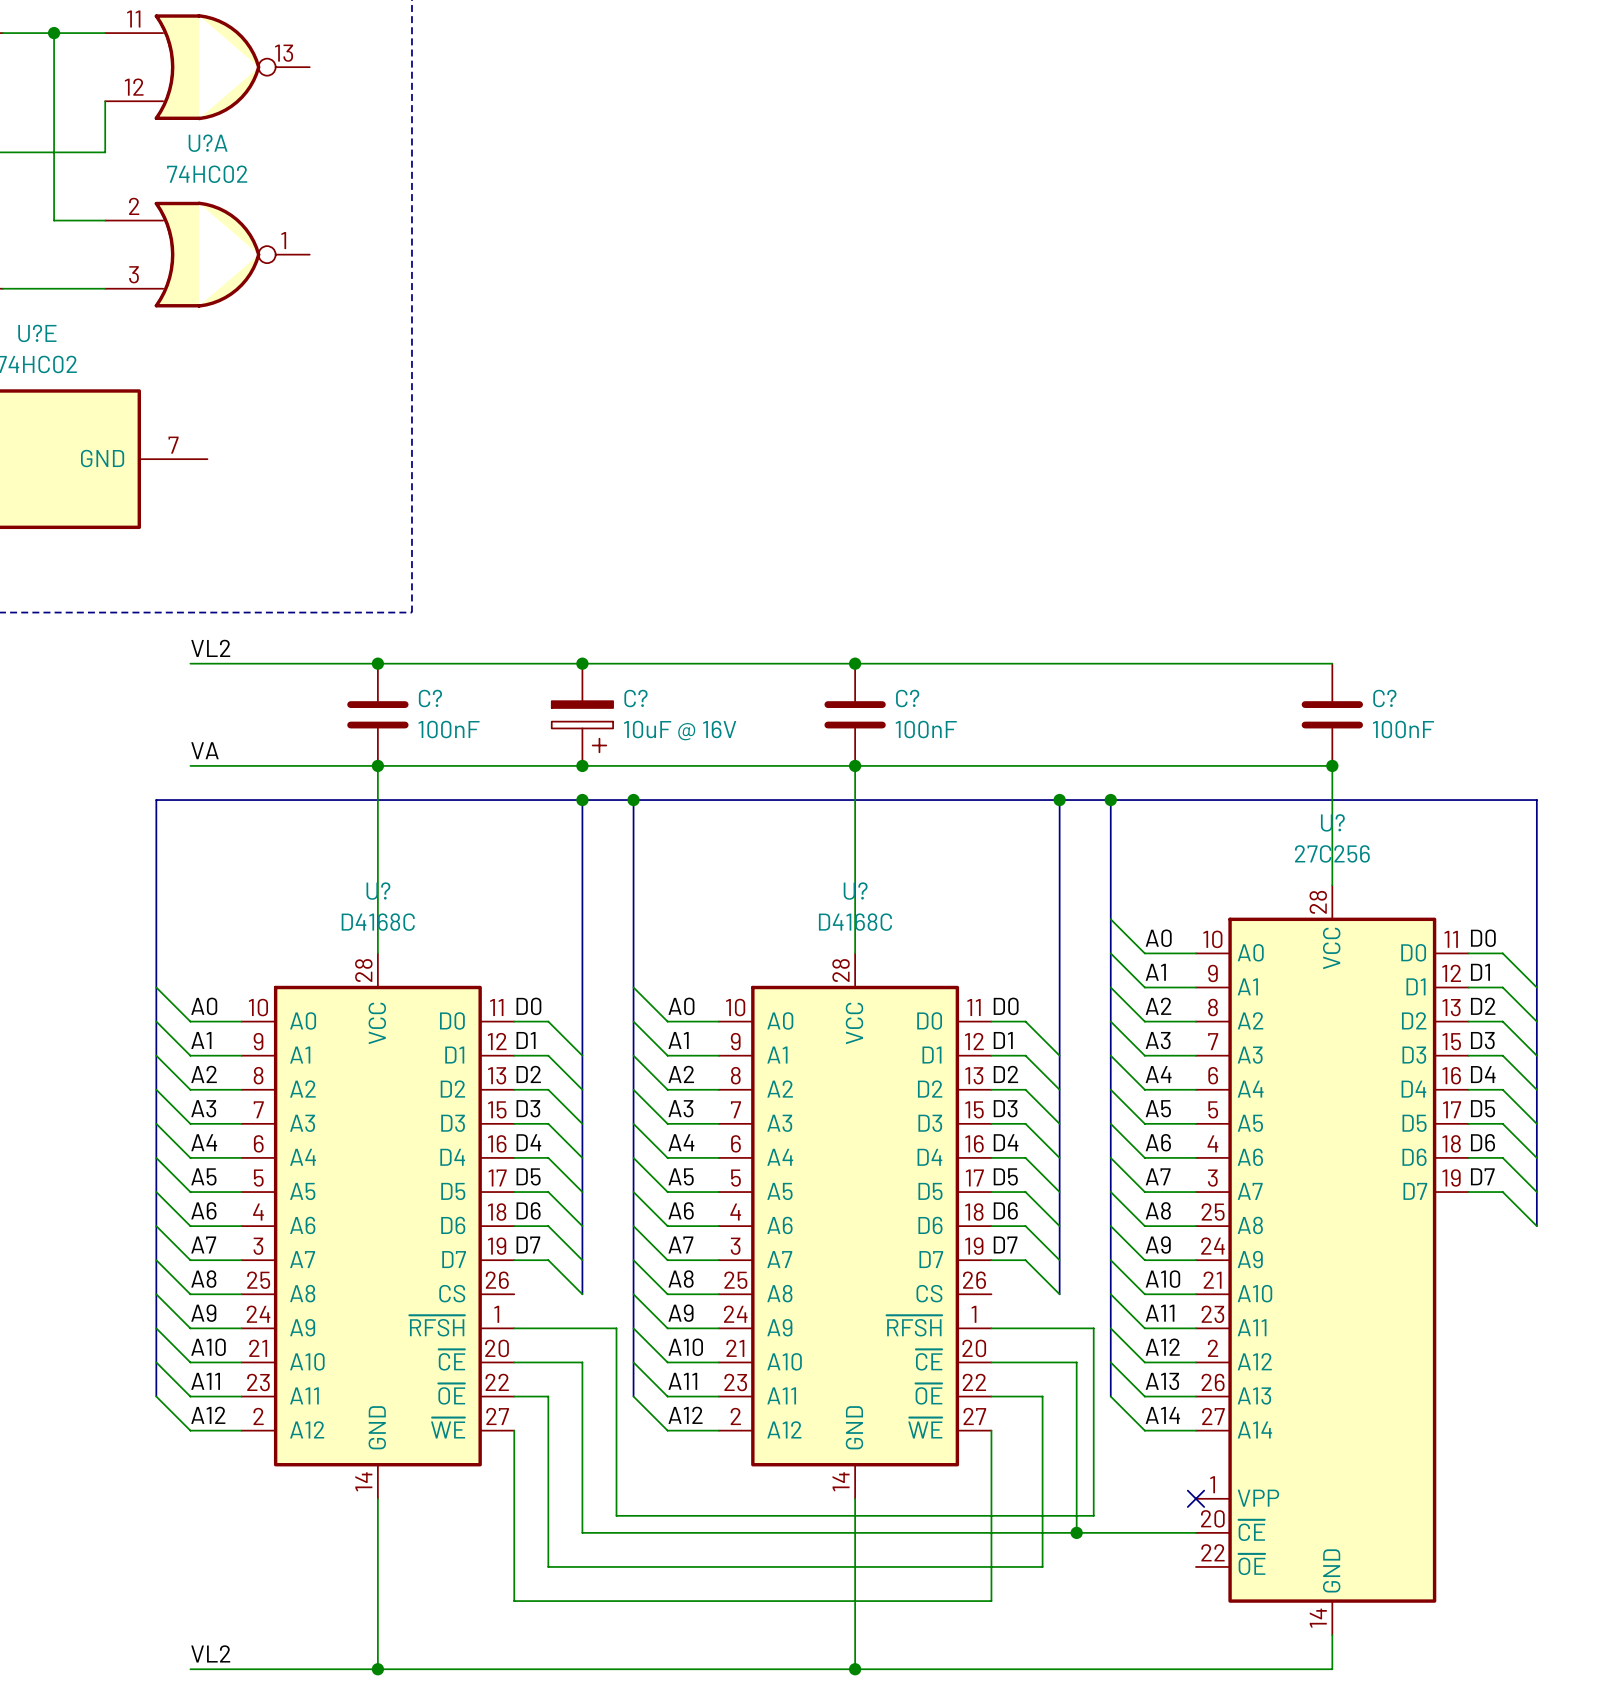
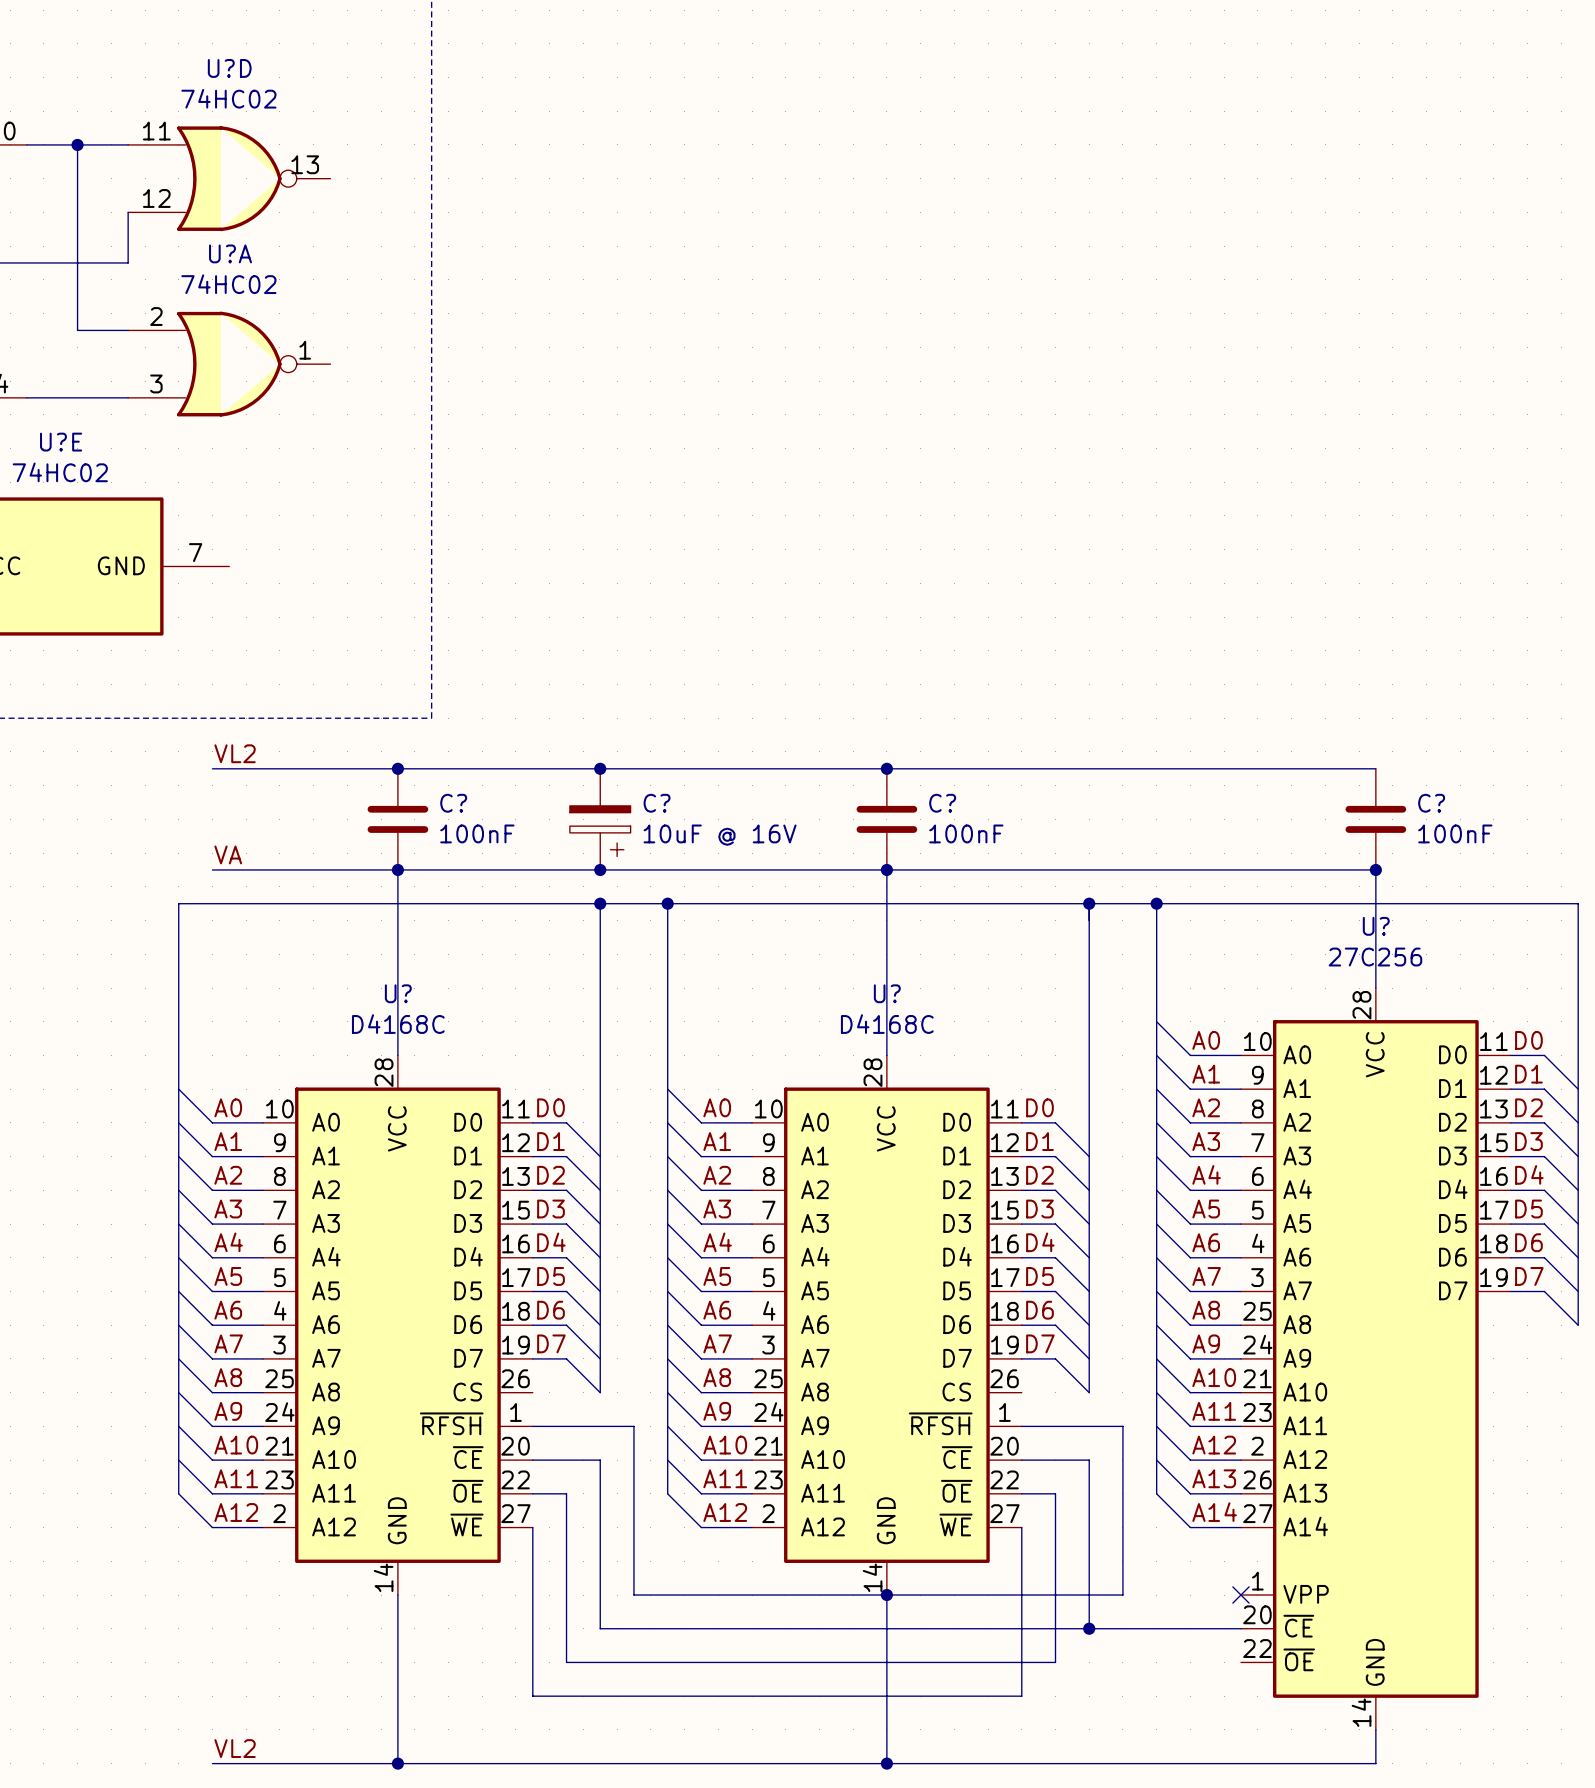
junction position: (855, 663) -> (886, 768)
wire: none -> (1342, 768) (1375, 768)
C? position: (855, 714) -> (886, 819)
C? position: (1332, 714) -> (1375, 819)
wire: (855, 765) (855, 953) -> (886, 869) (886, 1055)
junction position: (855, 765) -> (886, 869)
wire: (1332, 765) (1332, 885) -> (1342, 869) (1375, 869) (1375, 988)
junction position: (1332, 765) -> (1375, 869)
bus: (633, 800) (633, 1396) -> (667, 903) (667, 1493)
junction position: (633, 800) -> (667, 903)
bus: (1059, 800) (1059, 1294) -> (1089, 903) (1089, 1392)
junction: (1059, 800) -> none
junction: none -> (1089, 903)
bus: (1110, 800) (1110, 1396) -> (1156, 903) (1156, 1493)
junction: (1110, 800) -> none
junction: none -> (1156, 903)
bus: (1536, 800) (1536, 1226) -> (1544, 903) (1578, 903) (1578, 1325)
wire: (1110, 919) (1144, 953) (1178, 953) -> (1156, 1021) (1190, 1055)
label position: A0 (1158, 938) -> A0 (1206, 1040)
label position: D0 (1483, 938) -> D0 (1528, 1040)
wire: (1110, 953) (1144, 987) (1178, 987) -> (1156, 1055) (1190, 1089)
wire: (1468, 953) (1502, 953) (1536, 987) -> (1510, 1055) (1544, 1055) (1578, 1089)
label position: A1 (1155, 972) -> A1 (1206, 1074)
label position: D1 (1480, 972) -> D1 (1528, 1074)
wire: (633, 987) (667, 1021) (684, 1021) -> (667, 1089) (701, 1122)
wire: (1110, 987) (1144, 1021) (1178, 1021) -> (1156, 1089) (1190, 1122)
wire: (1468, 987) (1502, 987) (1536, 1021) -> (1510, 1089) (1544, 1089) (1578, 1122)
label position: A0 (681, 1006) -> A0 (717, 1107)
label position: D0 (1006, 1006) -> D0 (1039, 1107)
label position: A2 (1158, 1006) -> A2 (1206, 1107)
label position: D2 (1483, 1006) -> D2 (1528, 1107)
wire: (633, 1021) (667, 1055) (684, 1055) -> (667, 1122) (701, 1156)
wire: (1025, 1021) (1059, 1055) -> (1038, 1122) (1055, 1122) (1089, 1156)
wire: (1110, 1021) (1144, 1055) (1178, 1055) -> (1156, 1122) (1190, 1156)
wire: (1468, 1021) (1502, 1021) (1536, 1055) -> (1510, 1122) (1544, 1122) (1578, 1156)
label position: A1 (678, 1040) -> A1 (717, 1141)
label position: D1 (1003, 1040) -> D1 (1039, 1141)
label position: A3 (1158, 1040) -> A3 (1206, 1141)
label position: D3 (1482, 1040) -> D3 (1528, 1141)
wire: (633, 1055) (667, 1089) (684, 1089) -> (667, 1156) (701, 1190)
wire: (1025, 1055) (1059, 1089) -> (1038, 1156) (1055, 1156) (1089, 1190)
wire: (1110, 1055) (1144, 1089) (1178, 1089) -> (1156, 1156) (1190, 1190)
wire: (1468, 1055) (1502, 1055) (1536, 1089) -> (1510, 1156) (1544, 1156) (1578, 1190)
label position: A2 (681, 1074) -> A2 (717, 1175)
label position: D2 (1005, 1074) -> D2 (1039, 1175)
label position: A4 (1158, 1074) -> A4 (1206, 1174)
label position: D4 (1483, 1074) -> D4 (1529, 1174)
wire: (633, 1089) (667, 1123) (684, 1123) -> (667, 1190) (701, 1224)
wire: (1025, 1089) (1059, 1123) -> (1038, 1190) (1055, 1190) (1089, 1224)
wire: (1110, 1089) (1144, 1123) (1178, 1123) -> (1156, 1190) (1190, 1224)
wire: (1468, 1089) (1502, 1089) (1536, 1123) -> (1510, 1190) (1544, 1190) (1578, 1224)
label position: A3 (680, 1108) -> A3 (717, 1209)
label position: D3 (1005, 1108) -> D3 (1039, 1209)
label position: A5 (1158, 1108) -> A5 (1206, 1209)
label position: D5 (1482, 1108) -> D5 (1528, 1209)
wire: (633, 1123) (667, 1157) (684, 1157) -> (667, 1224) (701, 1257)
wire: (1025, 1123) (1059, 1157) -> (1038, 1224) (1055, 1224) (1089, 1257)
wire: (1110, 1123) (1144, 1157) (1178, 1157) -> (1156, 1224) (1190, 1257)
wire: (1468, 1123) (1502, 1123) (1536, 1157) -> (1510, 1224) (1544, 1224) (1578, 1257)
label position: A4 (681, 1142) -> A4 (717, 1242)
label position: D4 (1006, 1142) -> D4 (1040, 1242)
label position: A6 (1158, 1142) -> A6 (1206, 1242)
label position: D6 (1483, 1142) -> D6 (1528, 1242)
wire: (633, 1157) (667, 1192) (684, 1192) -> (667, 1257) (701, 1291)
wire: (1025, 1157) (1059, 1192) -> (1038, 1257) (1055, 1257) (1089, 1291)
wire: (1110, 1157) (1144, 1192) (1178, 1192) -> (1156, 1257) (1190, 1291)
wire: (1468, 1157) (1502, 1157) (1536, 1192) -> (1510, 1257) (1544, 1257) (1578, 1291)
label position: A5 (681, 1176) -> A5 (717, 1276)
label position: D5 (1005, 1176) -> D5 (1039, 1276)
label position: A7 (1158, 1176) -> A7 (1206, 1276)
label position: D7 (1482, 1176) -> D7 (1529, 1276)
wire: (633, 1192) (667, 1226) (684, 1226) -> (667, 1291) (701, 1325)
wire: (1025, 1192) (1059, 1226) -> (1038, 1291) (1055, 1291) (1089, 1325)
wire: (1110, 1192) (1144, 1226) (1178, 1226) -> (1156, 1291) (1190, 1325)
wire: (1468, 1192) (1502, 1192) (1536, 1226) -> (1510, 1291) (1544, 1291) (1578, 1325)
label position: A6 (681, 1210) -> A6 (717, 1310)
label position: D6 (1005, 1210) -> D6 (1039, 1310)
label position: A8 (1158, 1210) -> A8 (1206, 1310)
wire: (633, 1226) (667, 1260) (684, 1260) -> (667, 1325) (701, 1358)
U? position: (855, 1226) -> (886, 1325)
wire: (1025, 1226) (1059, 1260) -> (1038, 1325) (1055, 1325) (1089, 1358)
wire: (1110, 1226) (1144, 1260) (1178, 1260) -> (1156, 1325) (1190, 1358)
label position: A7 (680, 1244) -> A7 (717, 1343)
label position: D7 (1005, 1244) -> D7 (1040, 1343)
label position: A9 (1158, 1245) -> A9 (1206, 1343)
wire: (633, 1260) (667, 1294) (684, 1294) -> (667, 1358) (701, 1392)
wire: (1025, 1260) (1059, 1294) -> (1038, 1358) (1055, 1358) (1089, 1392)
wire: (1110, 1260) (1144, 1294) (1178, 1294) -> (1156, 1358) (1190, 1392)
U? position: (1332, 1260) -> (1375, 1358)
label position: A8 (681, 1279) -> A8 (717, 1377)
label position: A10 (1162, 1279) -> A10 (1214, 1377)
wire: (633, 1294) (667, 1328) (684, 1328) -> (667, 1392) (701, 1426)
wire: (1110, 1294) (1144, 1328) (1178, 1328) -> (1156, 1392) (1190, 1426)
label position: A9 (680, 1313) -> A9 (717, 1411)
label position: A11 (1160, 1313) -> A11 (1214, 1411)
wire: (633, 1328) (667, 1362) (684, 1362) -> (667, 1426) (701, 1460)
wire: (1093, 1328) (1093, 1515) (616, 1515) (616, 1498) -> (1106, 1426) (1122, 1426) (1122, 1595) (633, 1595)
wire: (1110, 1328) (1144, 1362) (1178, 1362) -> (1156, 1426) (1190, 1460)
label position: A10 (685, 1347) -> A10 (725, 1445)
label position: A12 (1162, 1347) -> A12 (1214, 1445)
wire: (633, 1362) (667, 1396) (684, 1396) -> (667, 1460) (701, 1493)
wire: (1110, 1362) (1144, 1396) (1178, 1396) -> (1156, 1460) (1190, 1493)
label position: A11 (682, 1381) -> A11 (725, 1478)
label position: A13 (1162, 1381) -> A13 (1214, 1478)
wire: (633, 1396) (667, 1430) (684, 1430) -> (667, 1493) (701, 1527)
wire: (1110, 1396) (1144, 1430) (1178, 1430) -> (1156, 1493) (1190, 1527)
label position: A12 (685, 1415) -> A12 (725, 1512)
label position: A14 (1162, 1415) -> A14 (1214, 1512)
wire: (991, 1430) (991, 1601) -> (1021, 1527) (1021, 1696) (1004, 1696)
wire: (855, 1498) (855, 1669) -> (886, 1595) (886, 1763)
junction: none -> (886, 1595)
no-connect mark position: (1195, 1498) -> (1240, 1595)
wire: (1332, 1635) (1332, 1669) -> (1375, 1729) (1375, 1763) (1342, 1763)
junction position: (855, 1669) -> (886, 1763)

